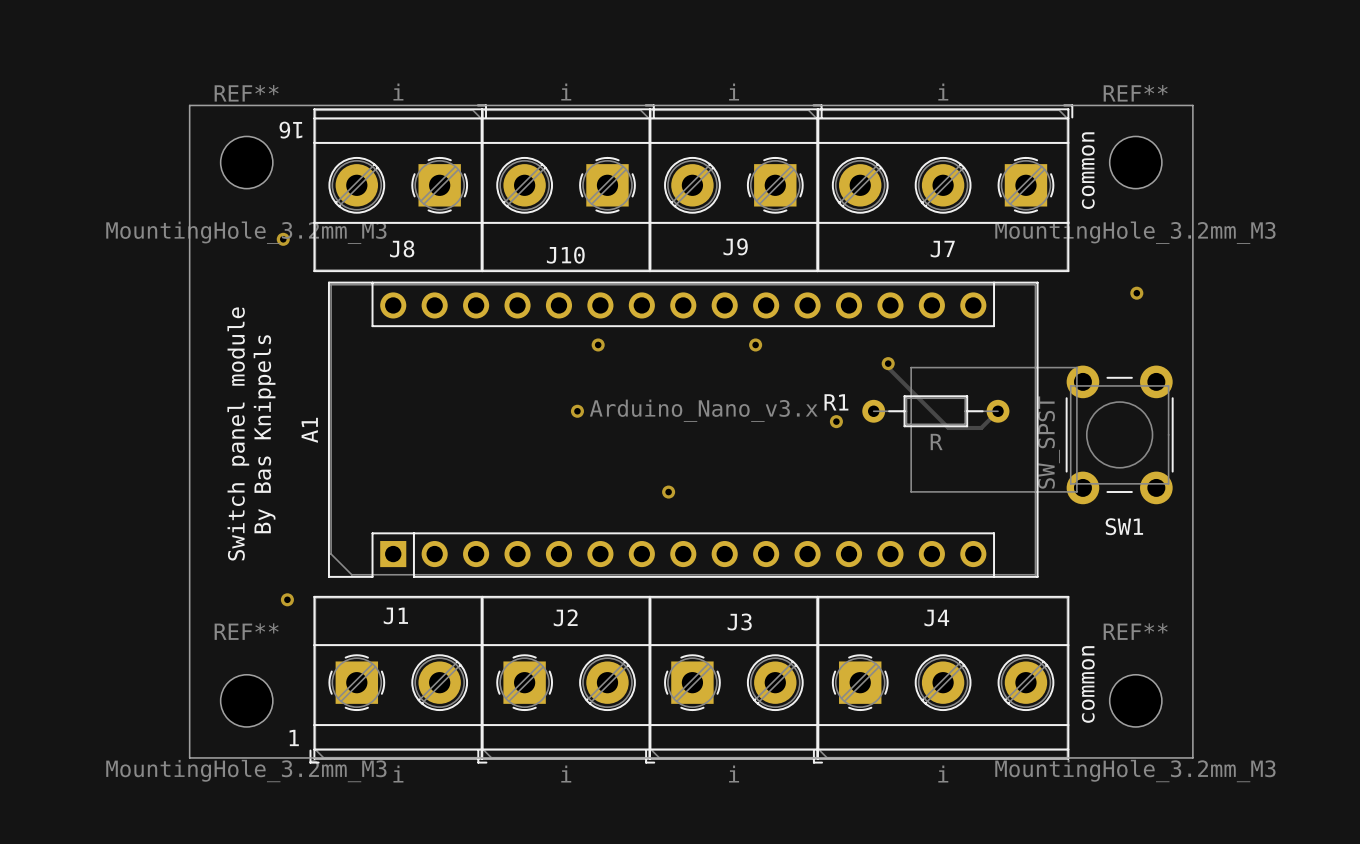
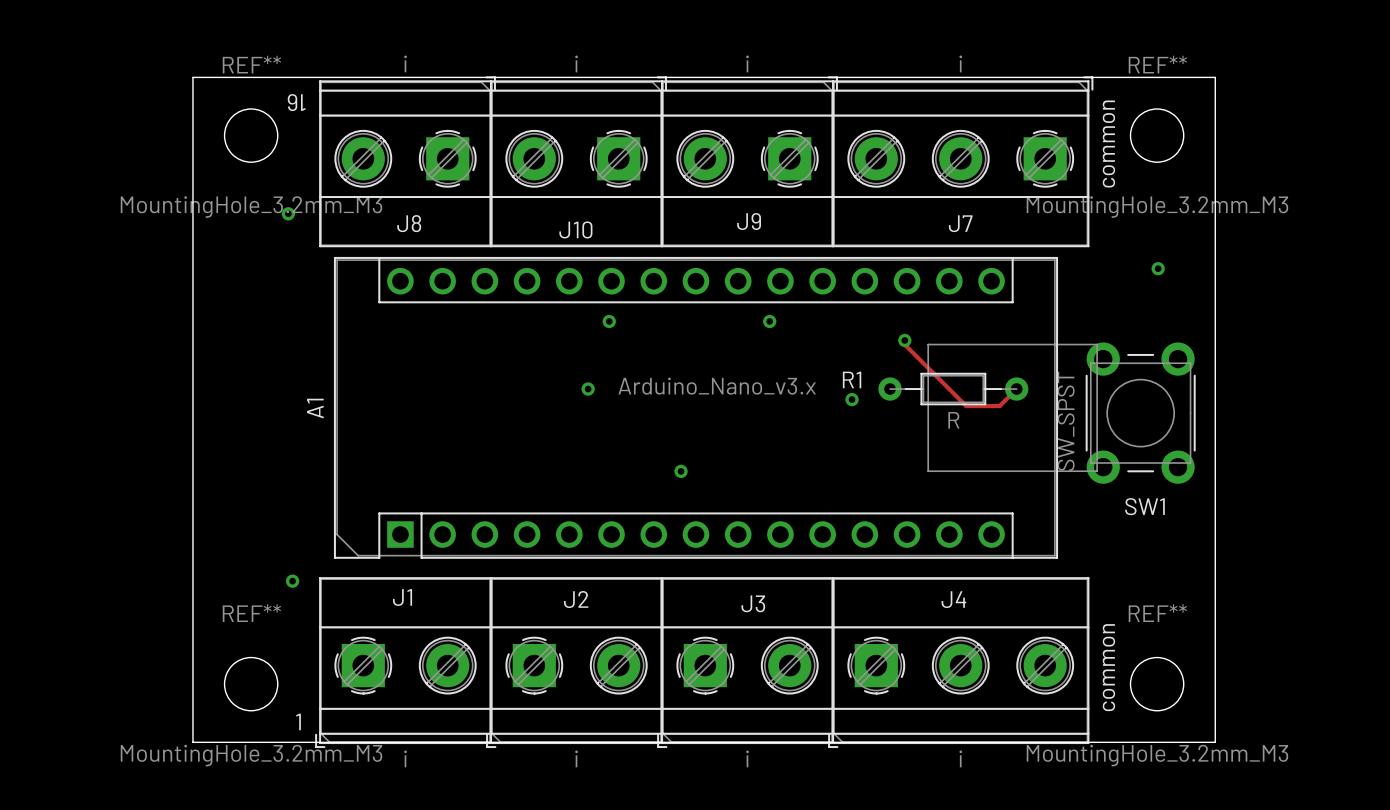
text: Switch panel module (238, 433) -> none
text: By Bas Knippels (264, 434) -> none

